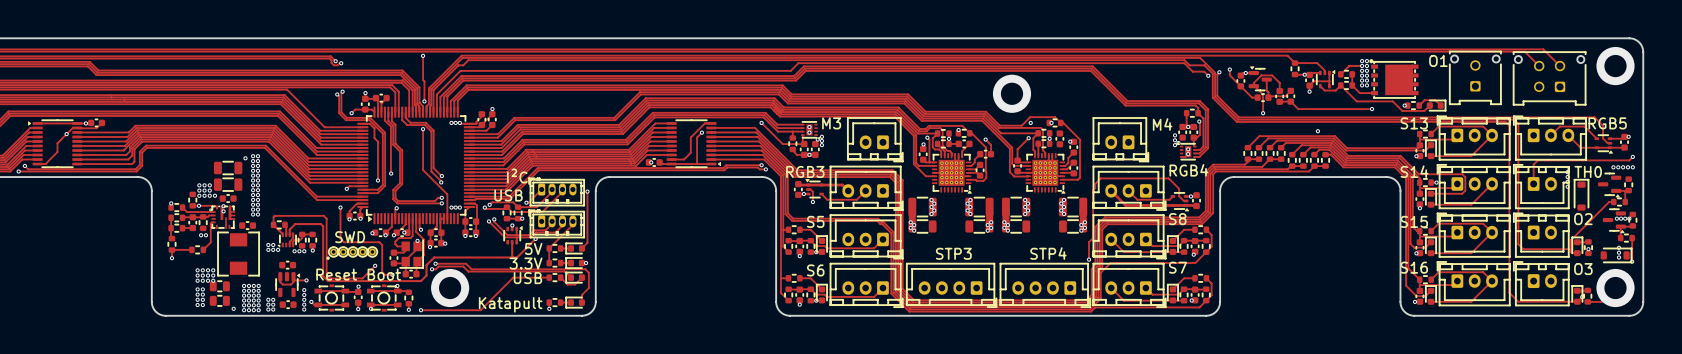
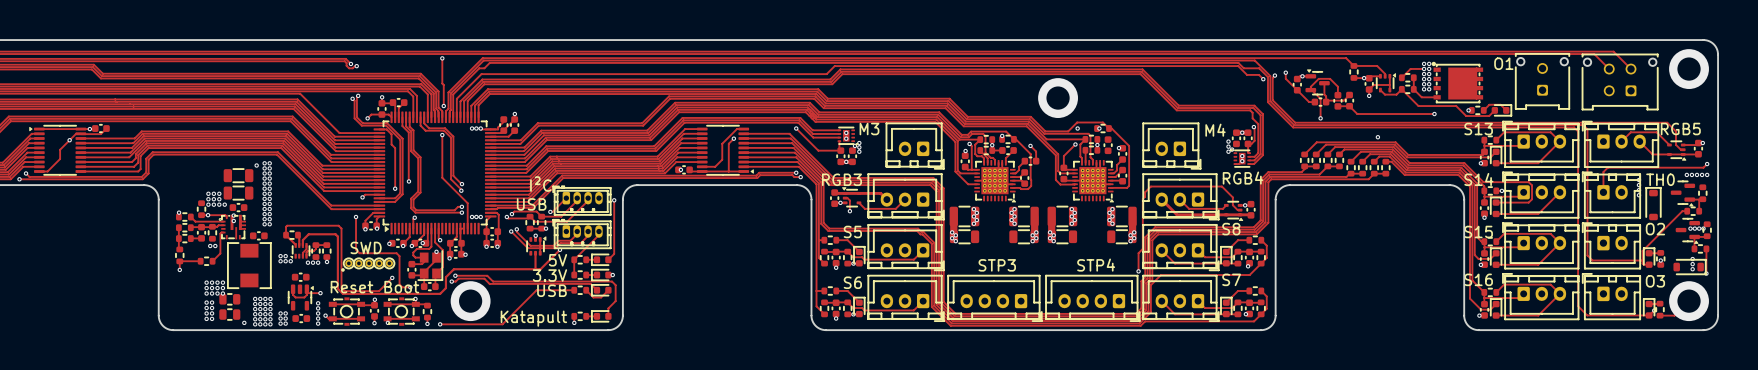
track: (1186, 113) (1186, 125) (1189, 125) -> none
part: (1192, 113) -> none
track: (792, 131) (792, 138) -> none
part: (792, 143) -> none
track: (792, 149) (796, 154) (804, 154) -> none

